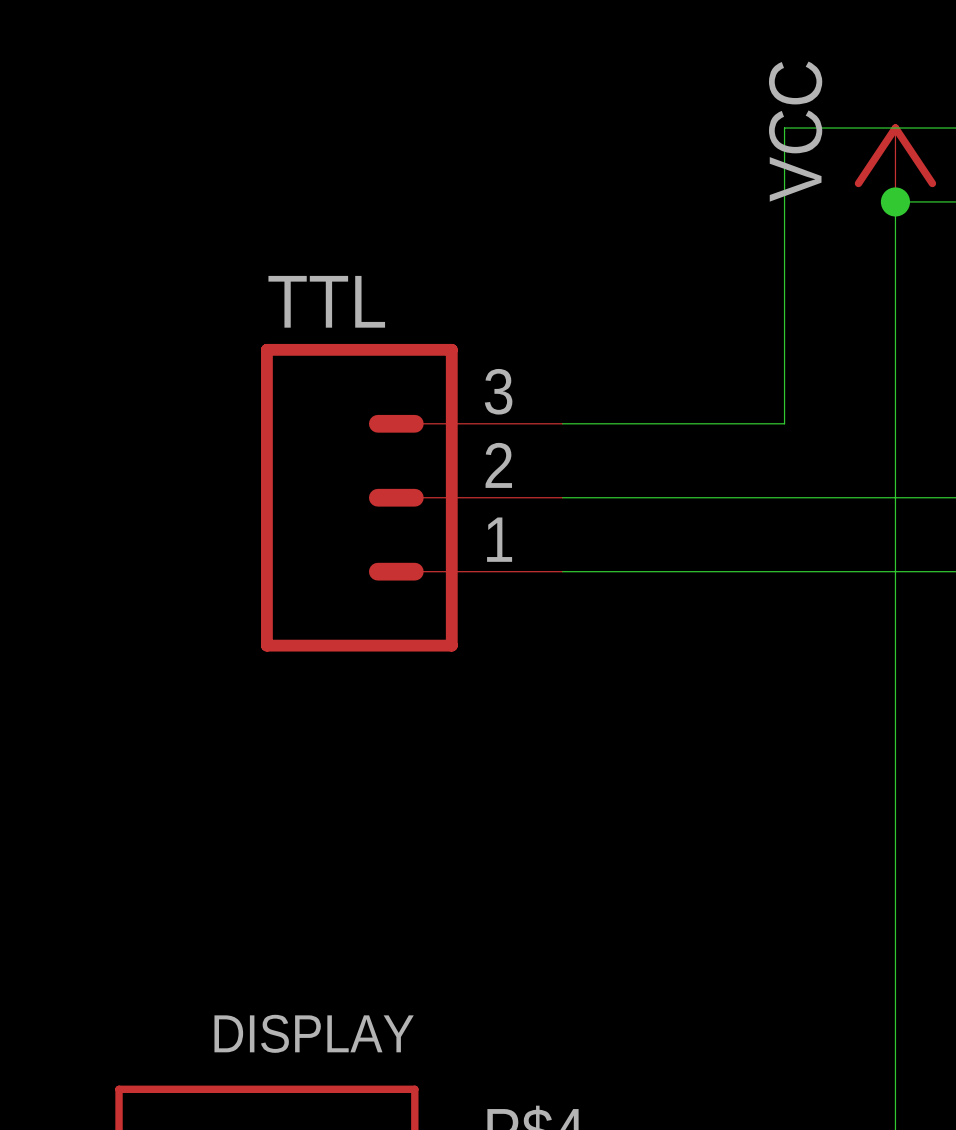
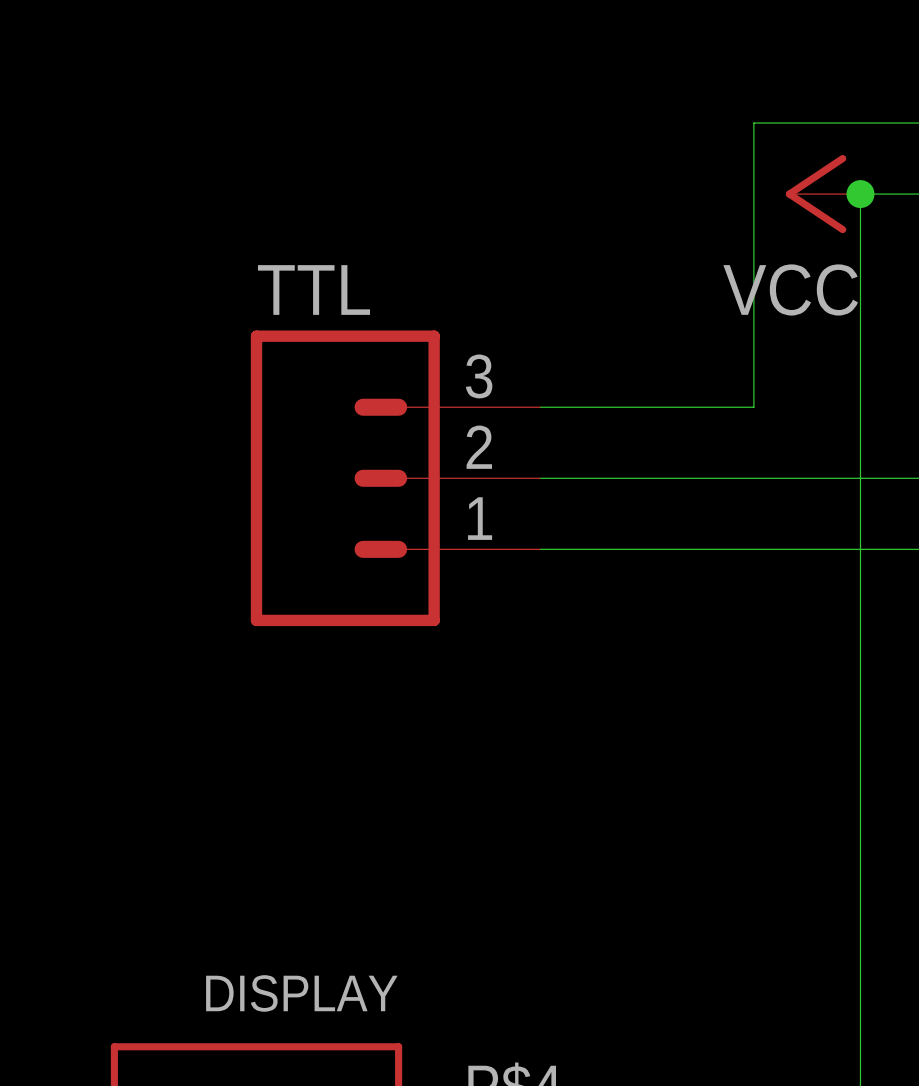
power symbol rotation: 0° (895, 155) -> 90° counterclockwise (816, 194)
power symbol position: VCC (895, 163) -> VCC (823, 194)

